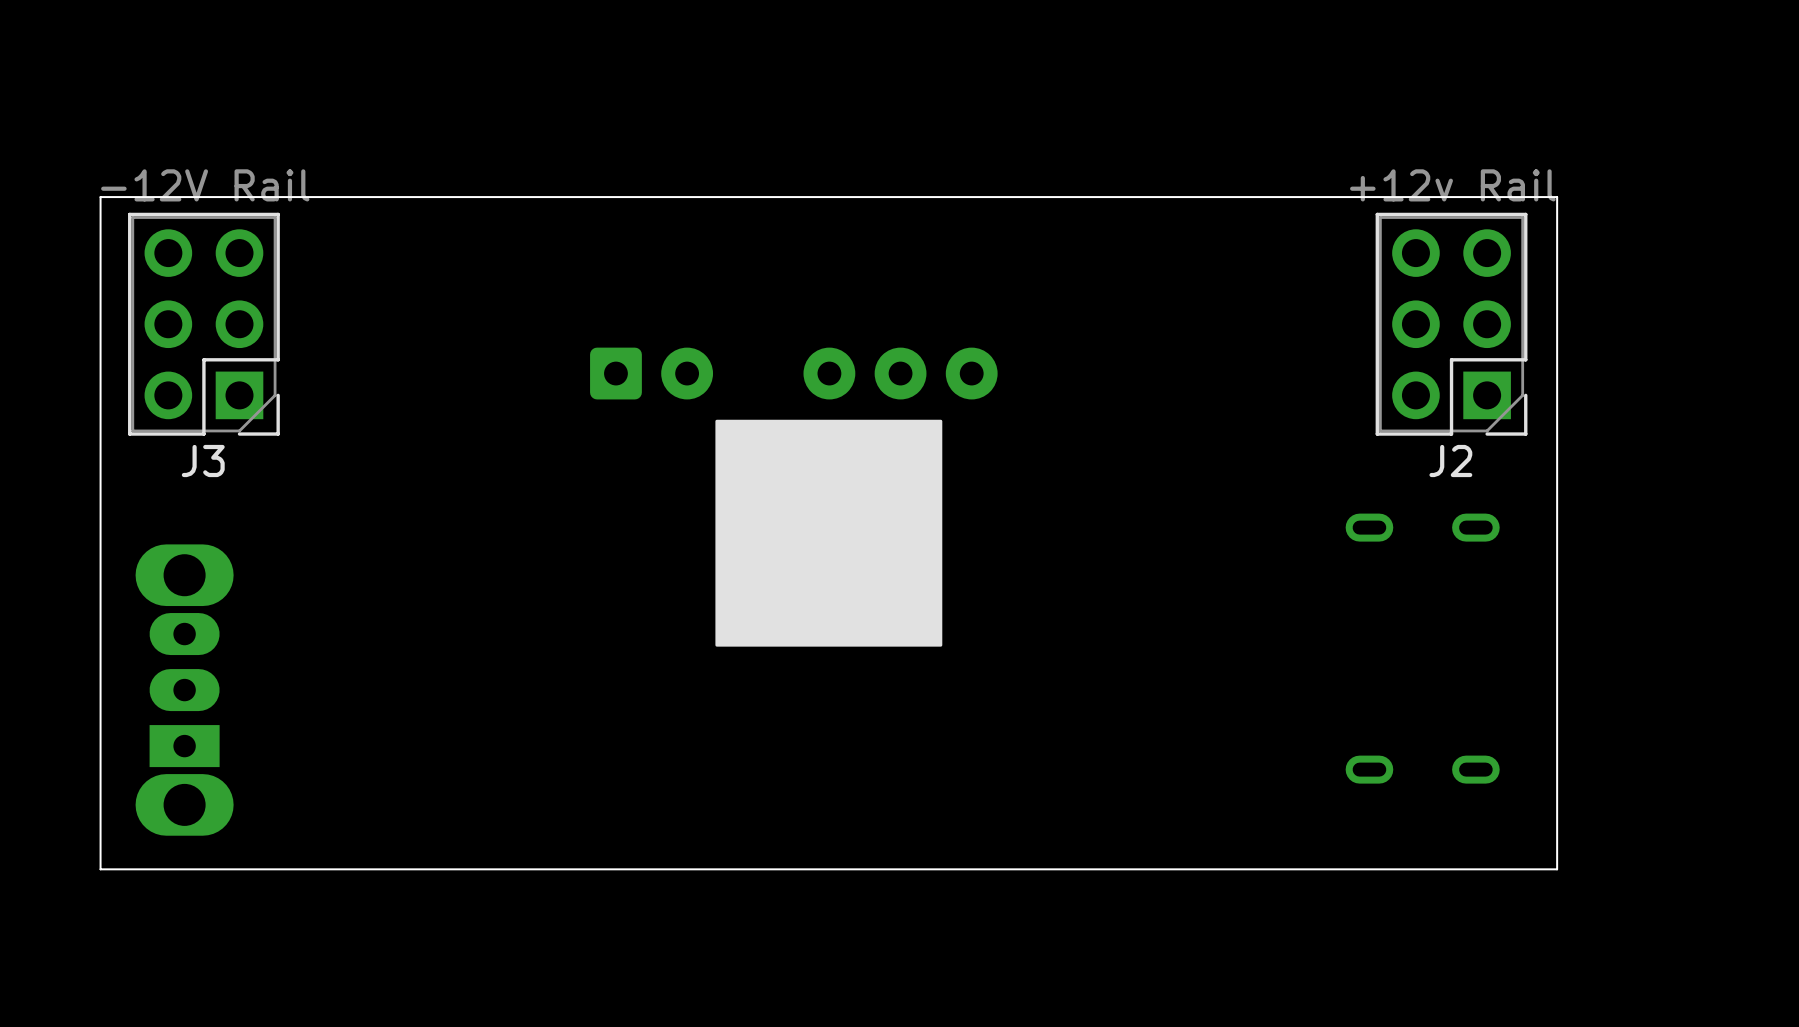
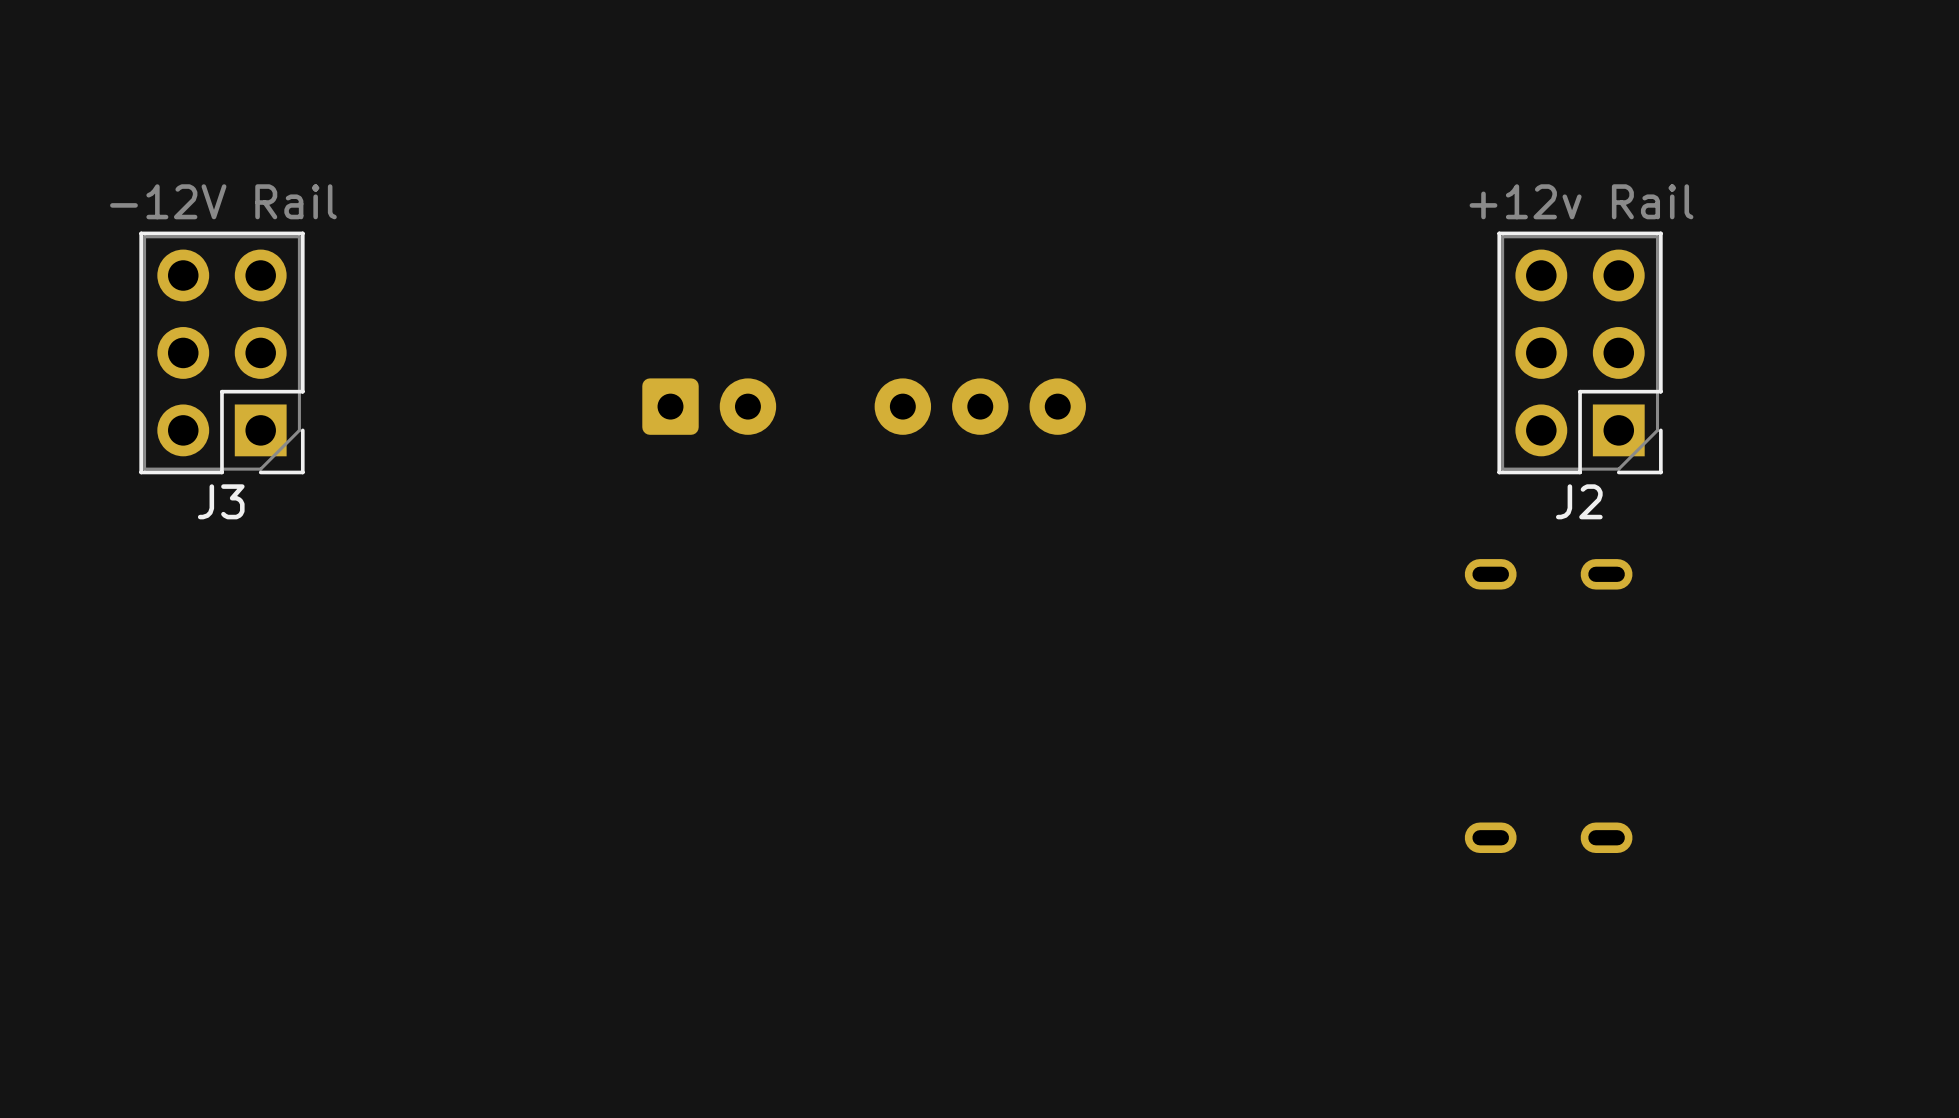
board edge: (1557, 197) (100, 197) (100, 869) (1557, 869) (1557, 197) -> none
drawing: [715, 419, 943, 647] -> none
part: (184, 690) -> none

